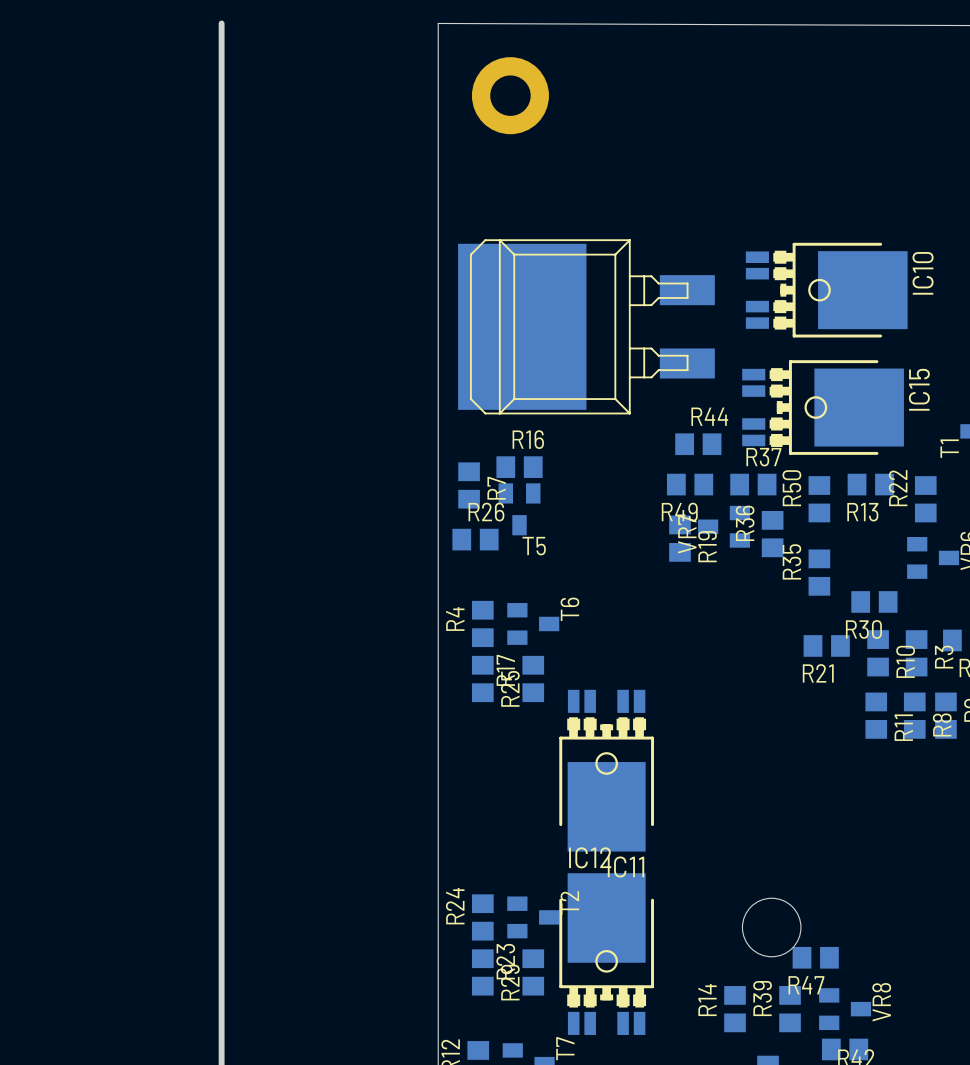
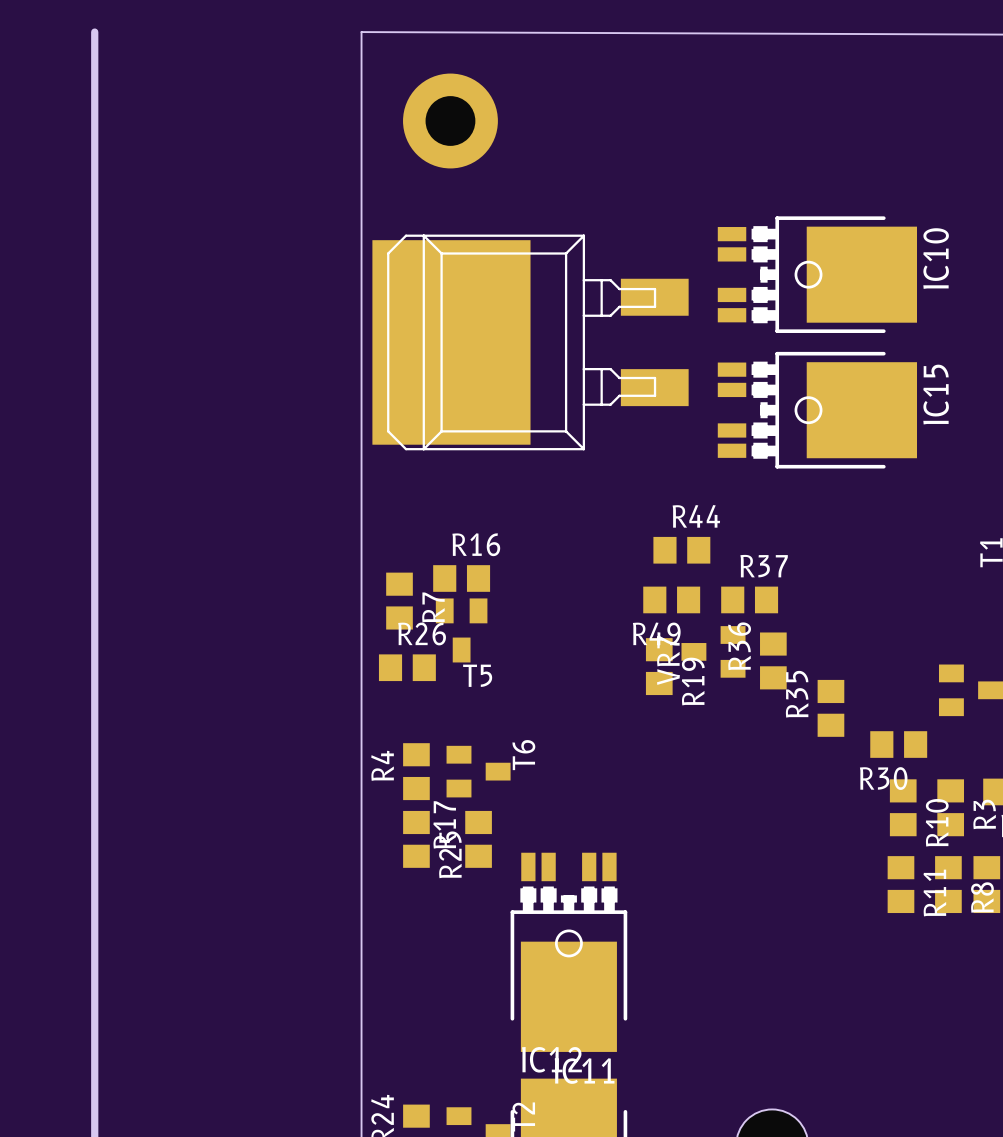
IC10 position: (826, 290) -> (817, 274)
part position: (586, 326) -> (530, 342)
IC15 position: (823, 407) -> (817, 410)
R13: (870, 484) -> none
R50: (819, 499) -> none
R22: (925, 499) -> none
R21: (826, 645) -> none

